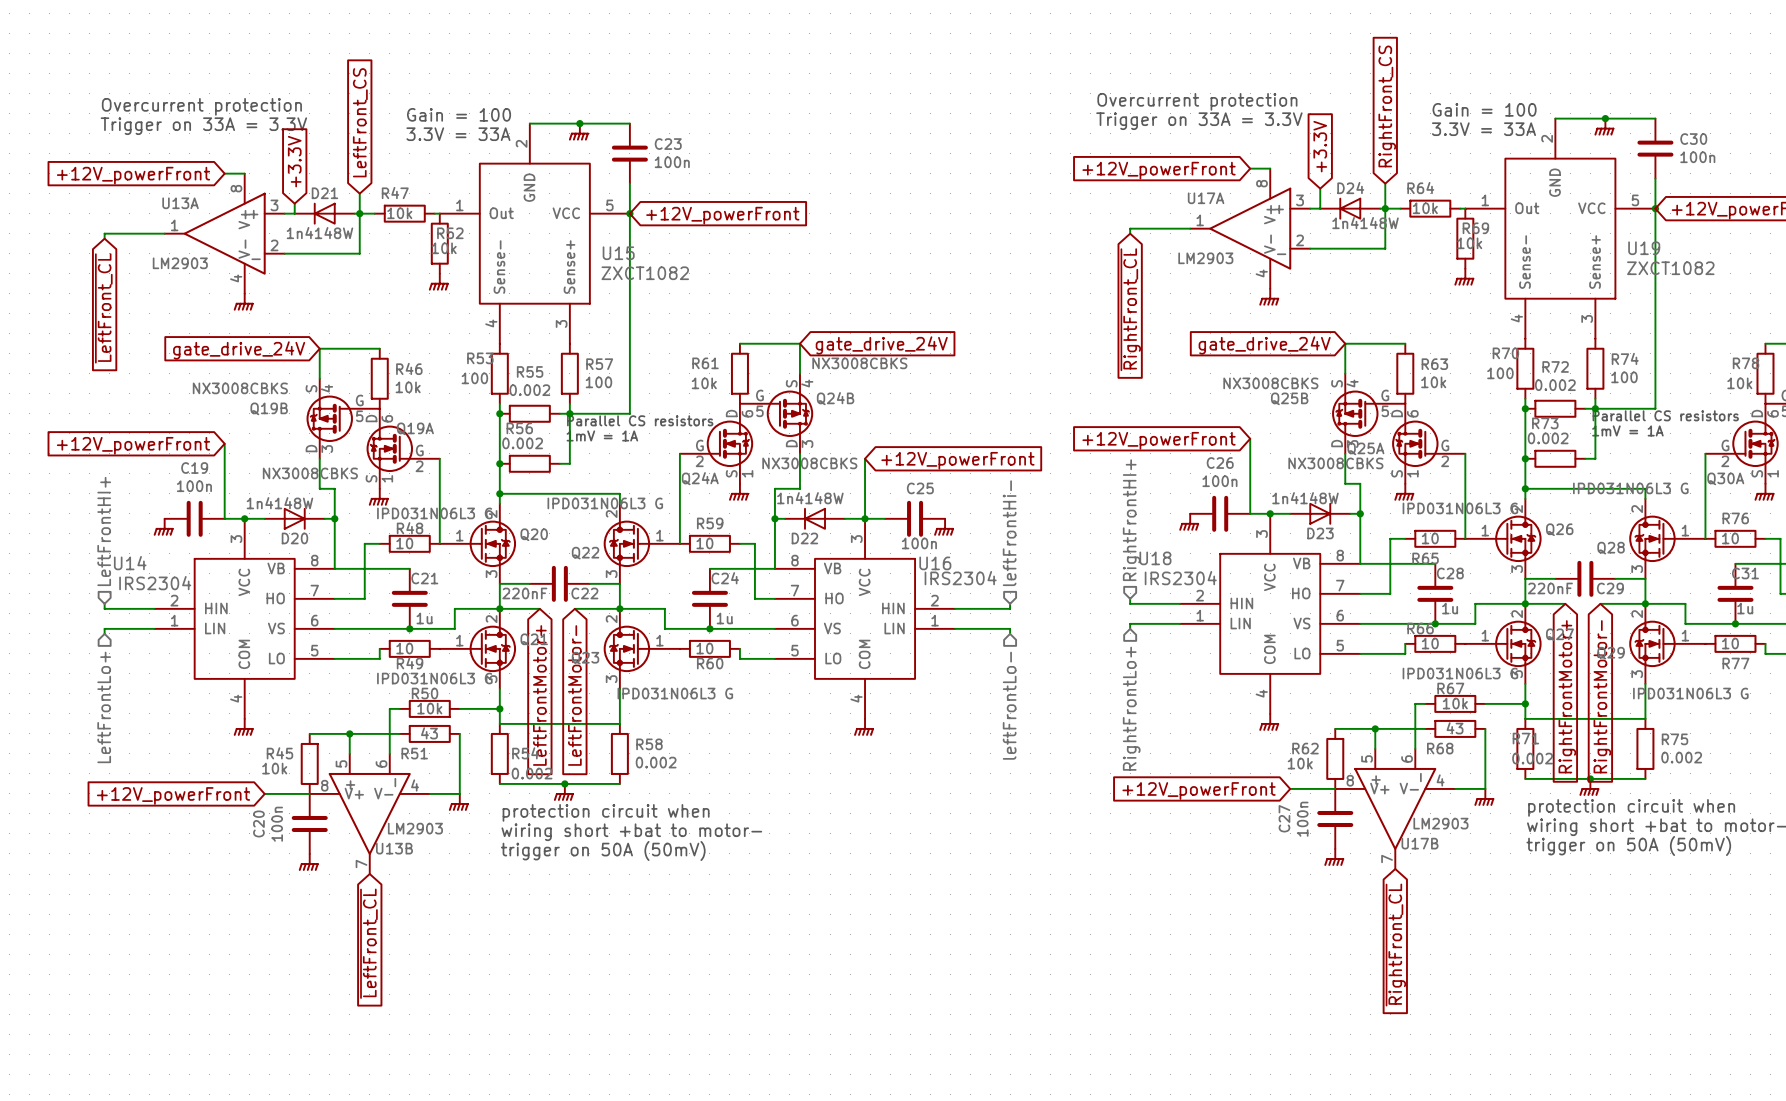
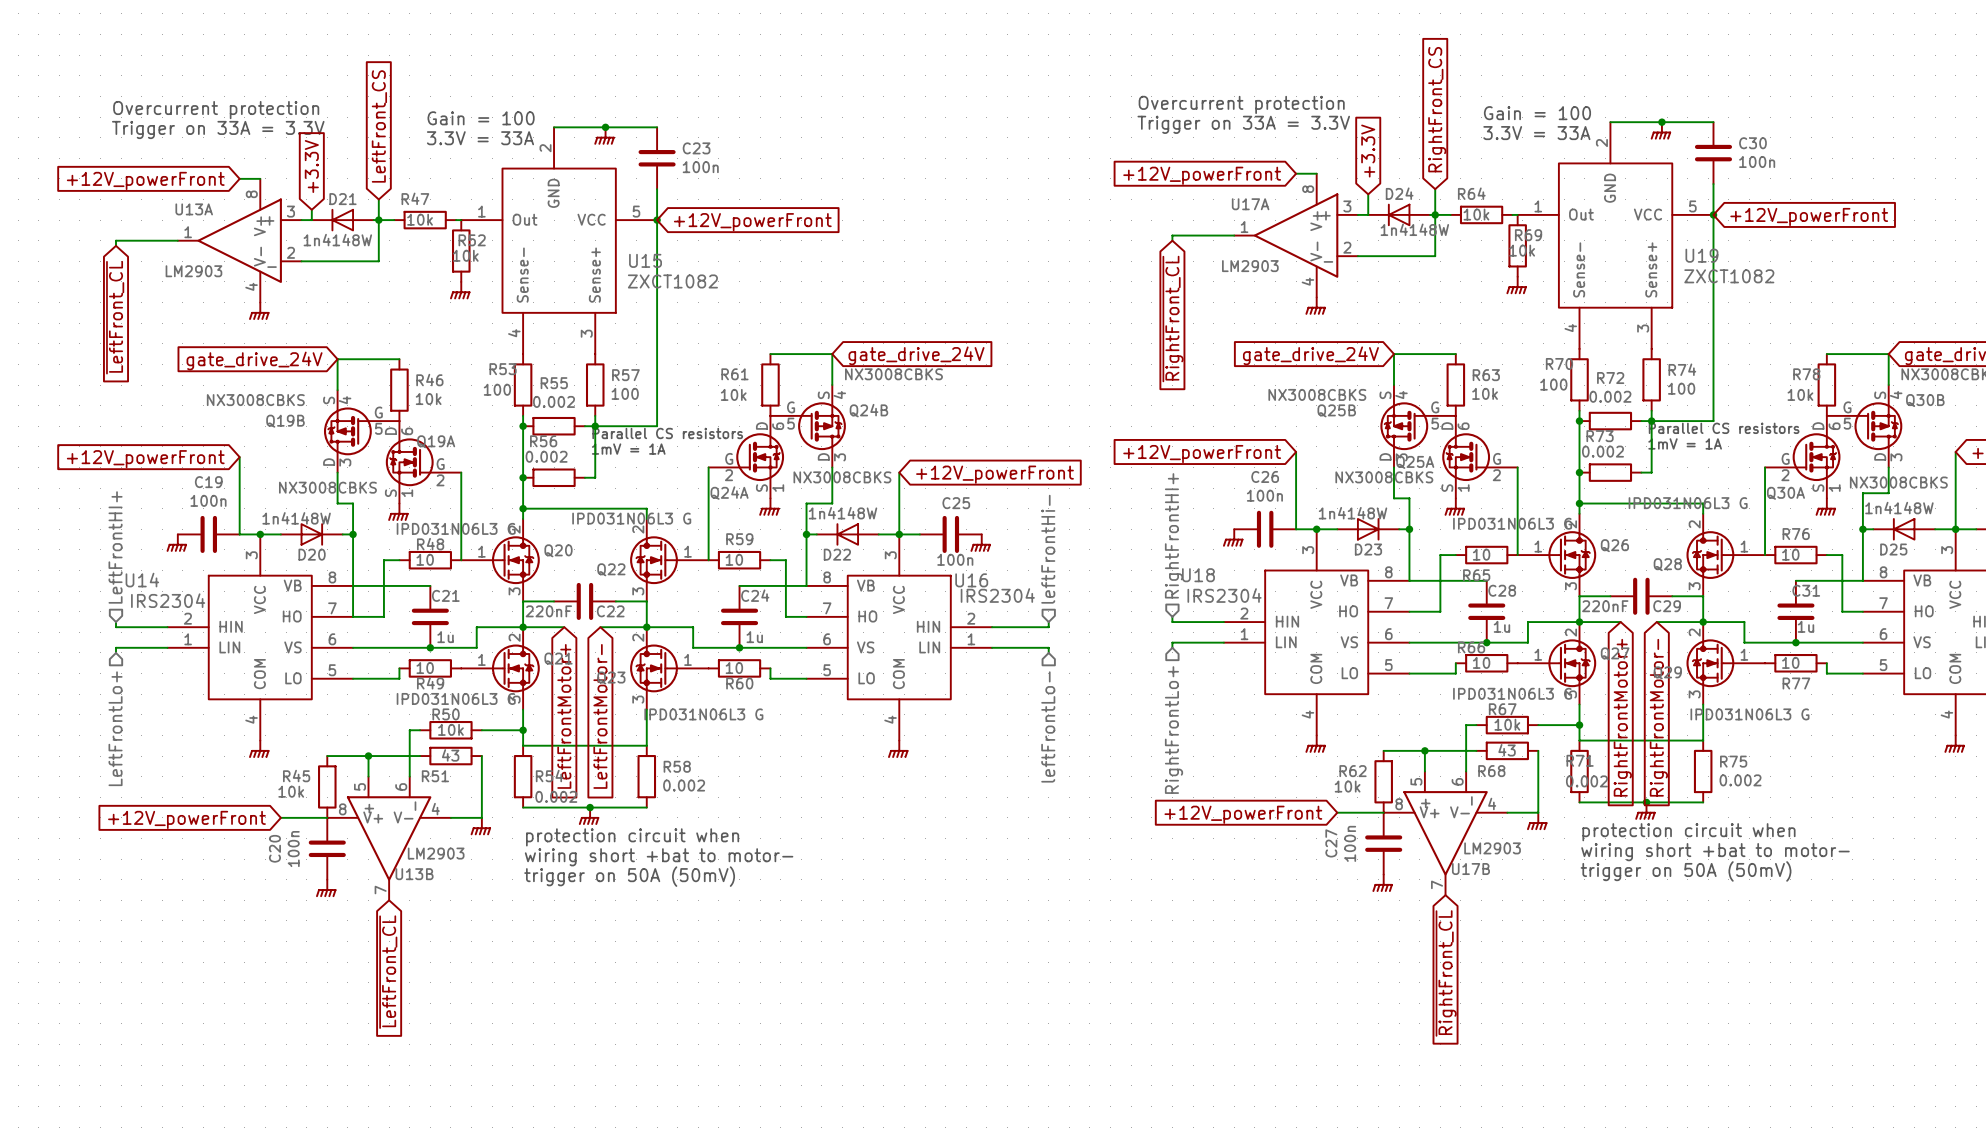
wire: none -> (353, 585) (353, 616)

